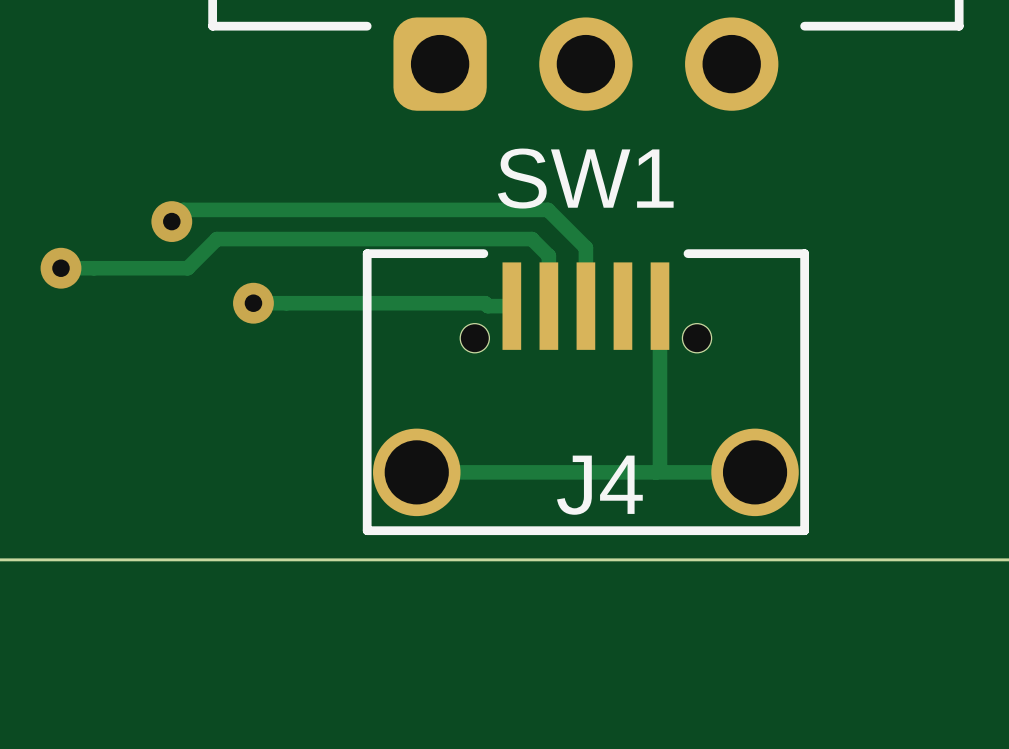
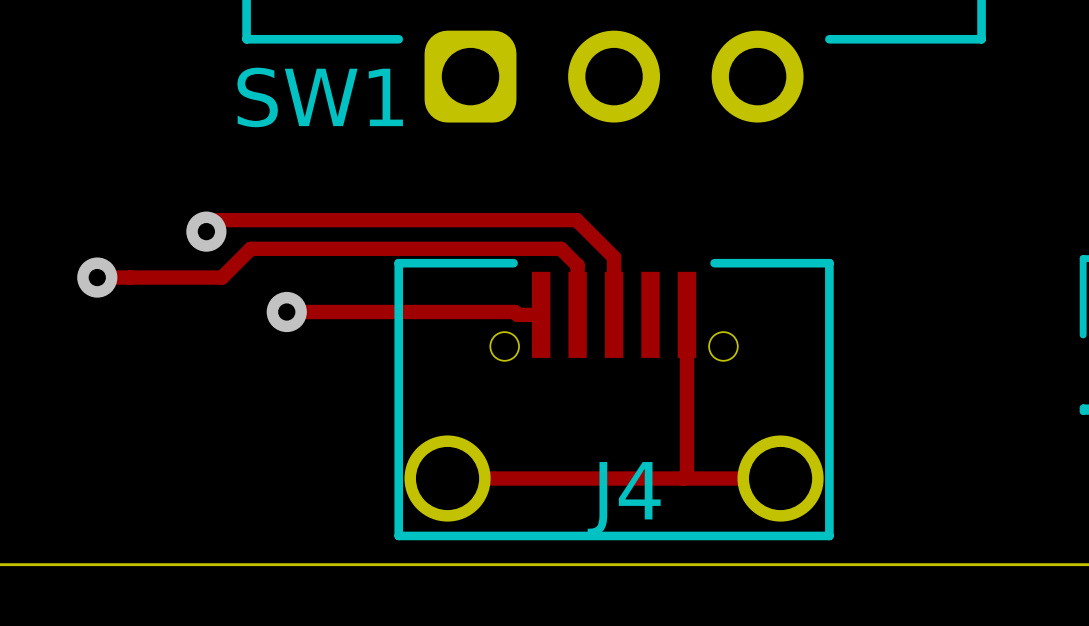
SW1 name position: SW1 (585, 178) -> SW1 (320, 97)

